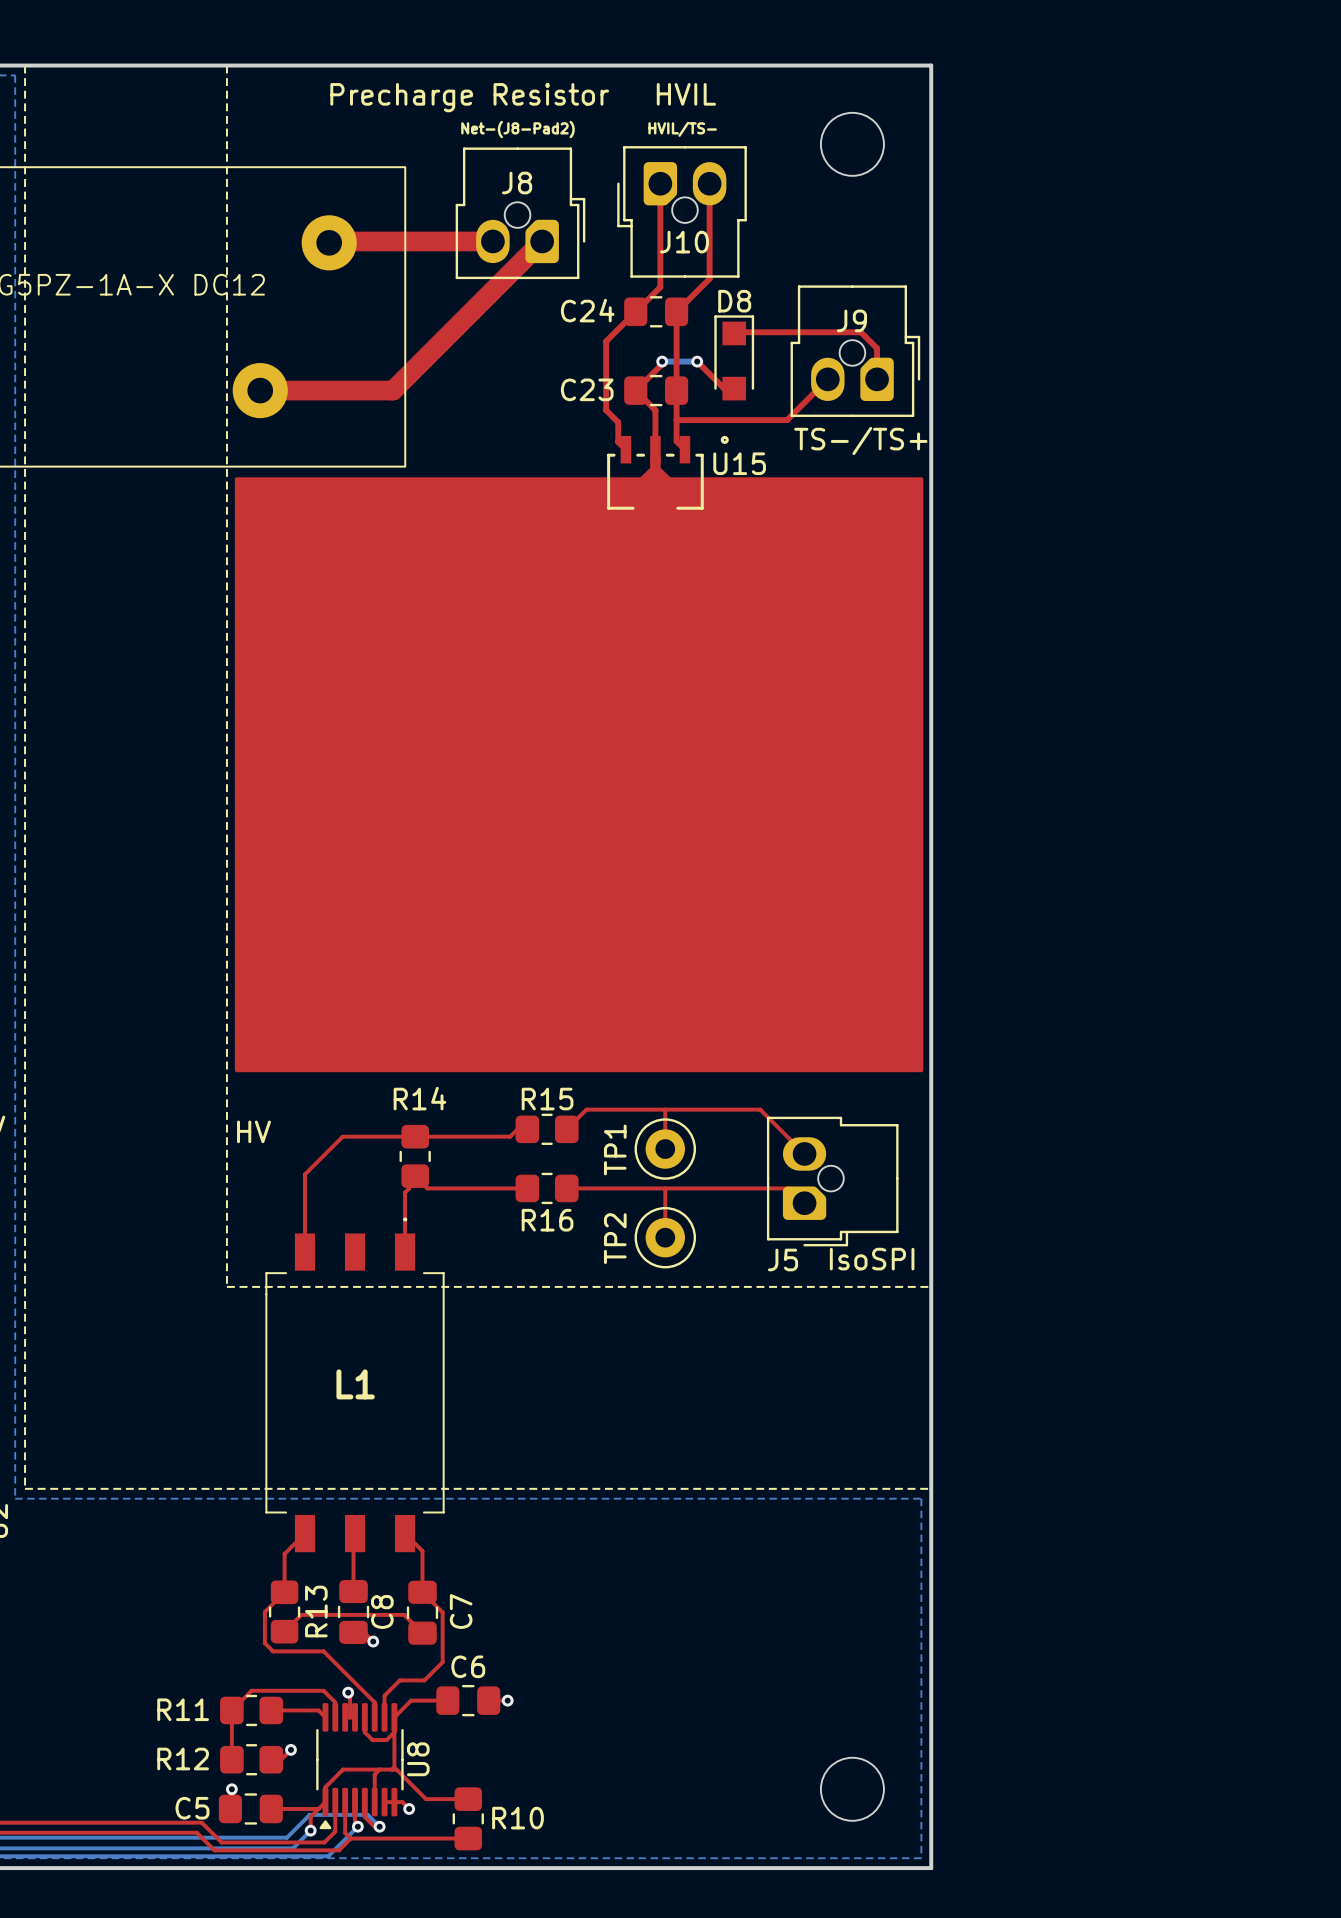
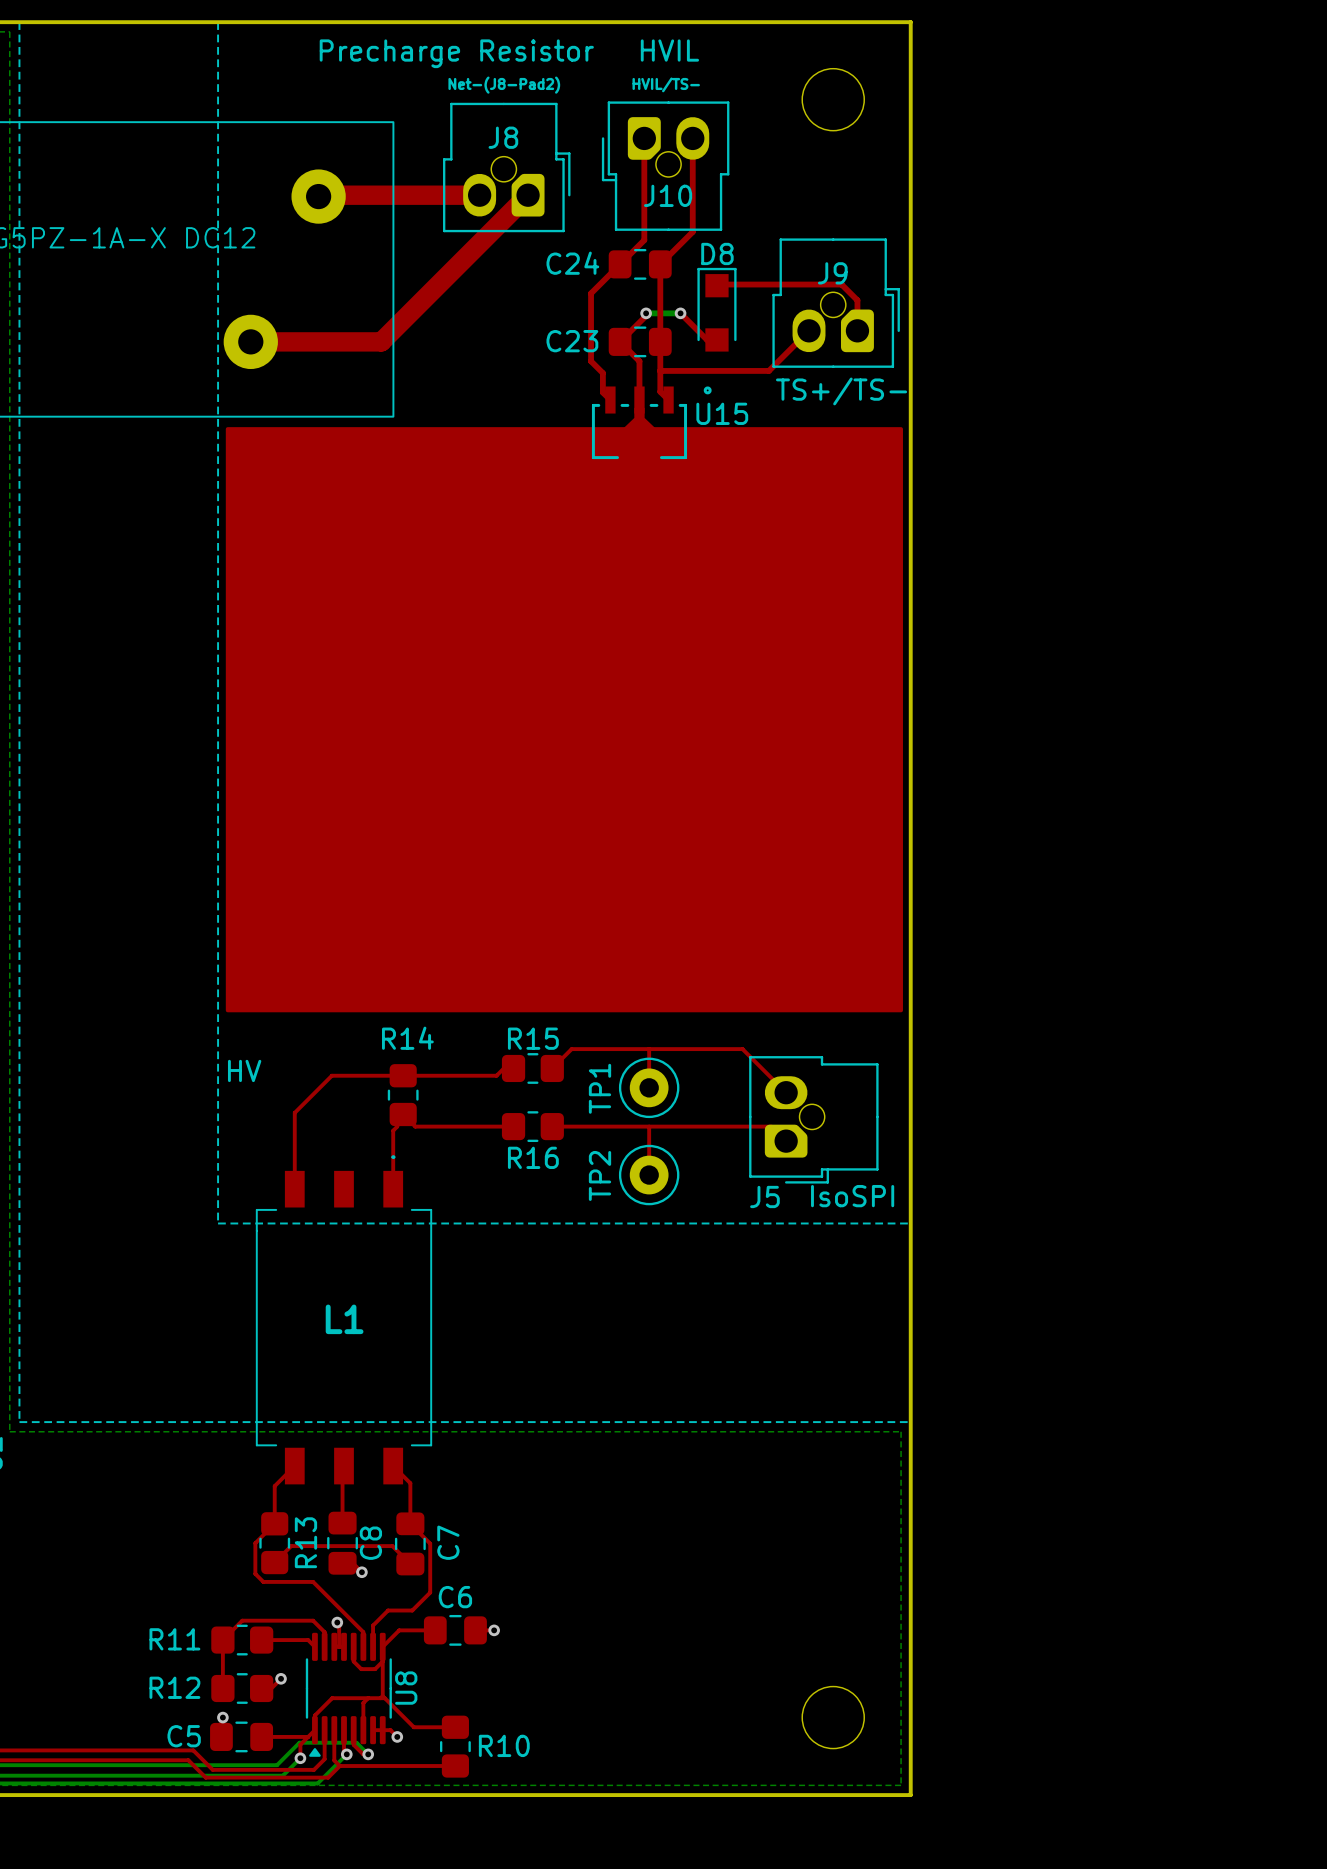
J9 value: TS-/TS+ (860, 440) -> TS+/TS- (841, 391)

